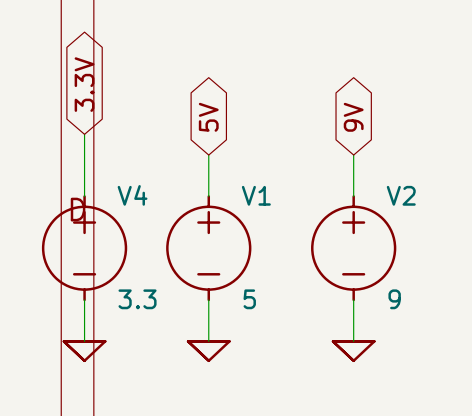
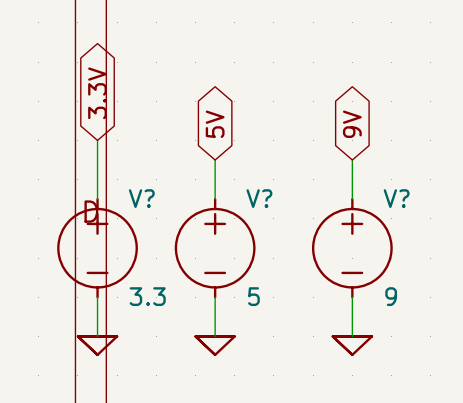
V4 name: V4 (132, 195) -> V? (141, 198)
V1 name: V1 (256, 195) -> V? (259, 198)
V2 name: V2 (401, 195) -> V? (396, 198)

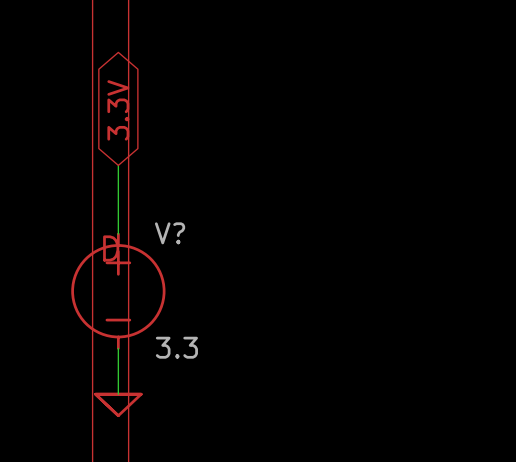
global label: 5V (215, 124) -> none
global label: 9V (352, 124) -> none
wire: (215, 160) (215, 199) -> none
wire: (352, 160) (352, 199) -> none
V?: 5 (215, 248) -> none
V?: 9 (352, 248) -> none
wire: (215, 297) (215, 336) -> none
wire: (352, 297) (352, 336) -> none
power symbol: (215, 345) -> none
power symbol: (352, 345) -> none

